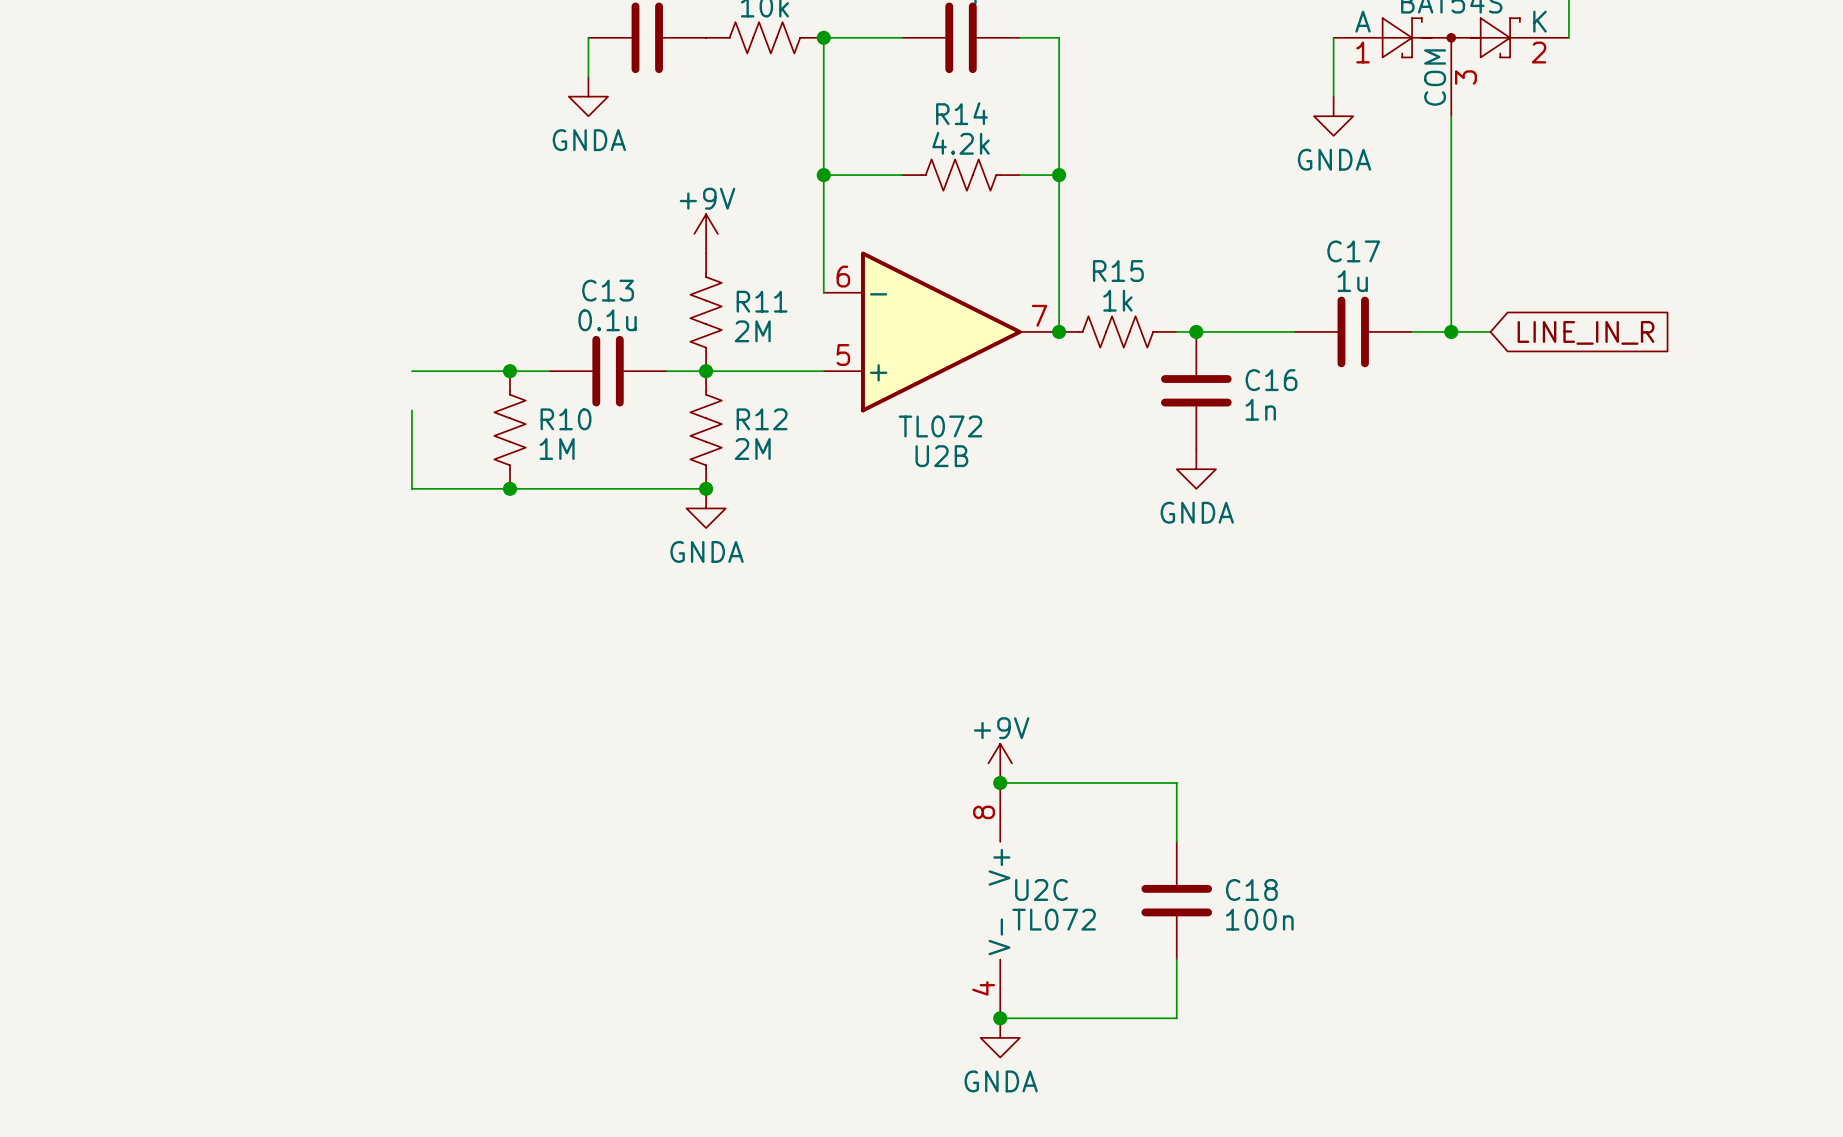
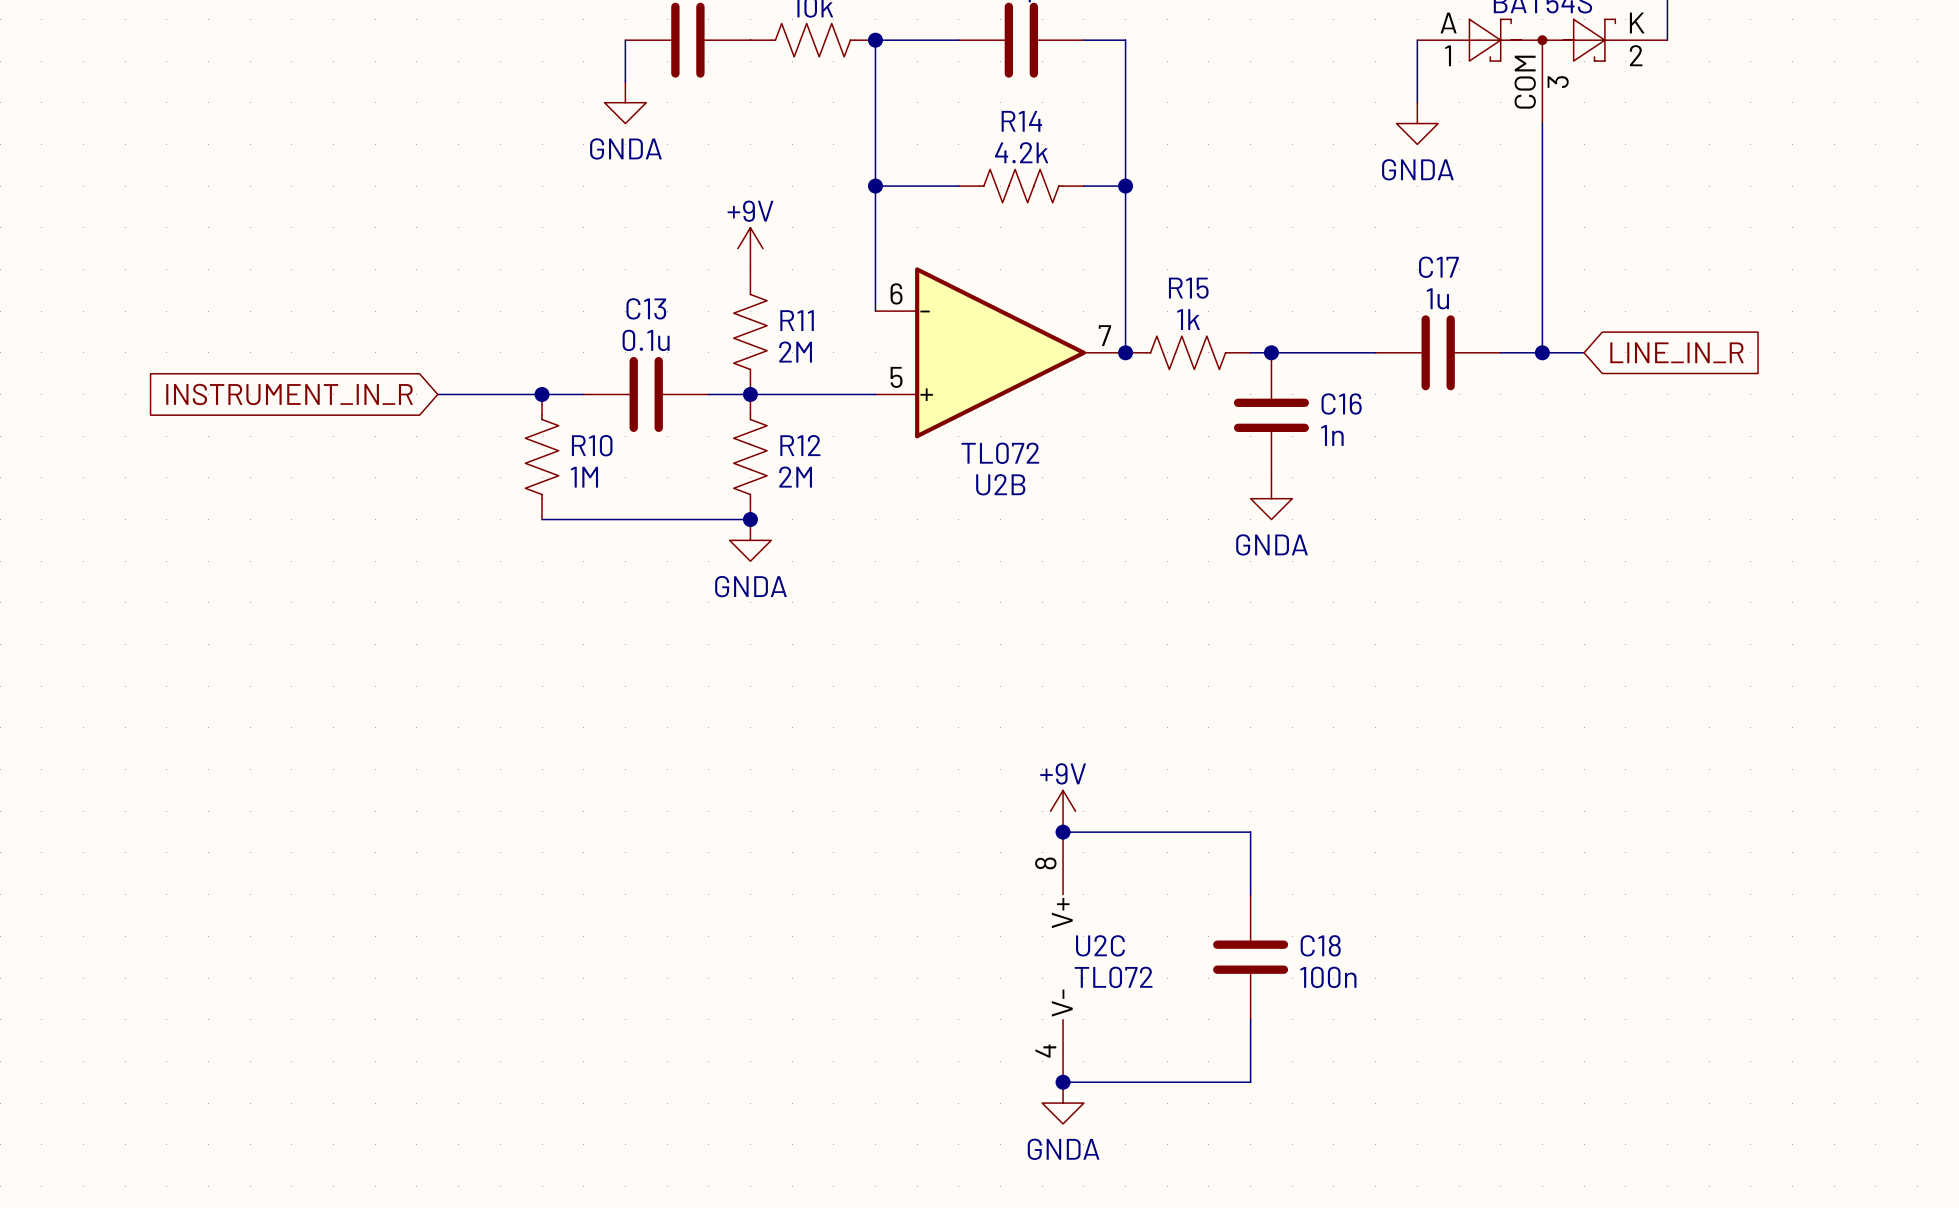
global label: none -> INSTRUMENT_IN_R (289, 394)
wire: (411, 410) (411, 488) (510, 488) -> none
junction: (510, 488) -> none

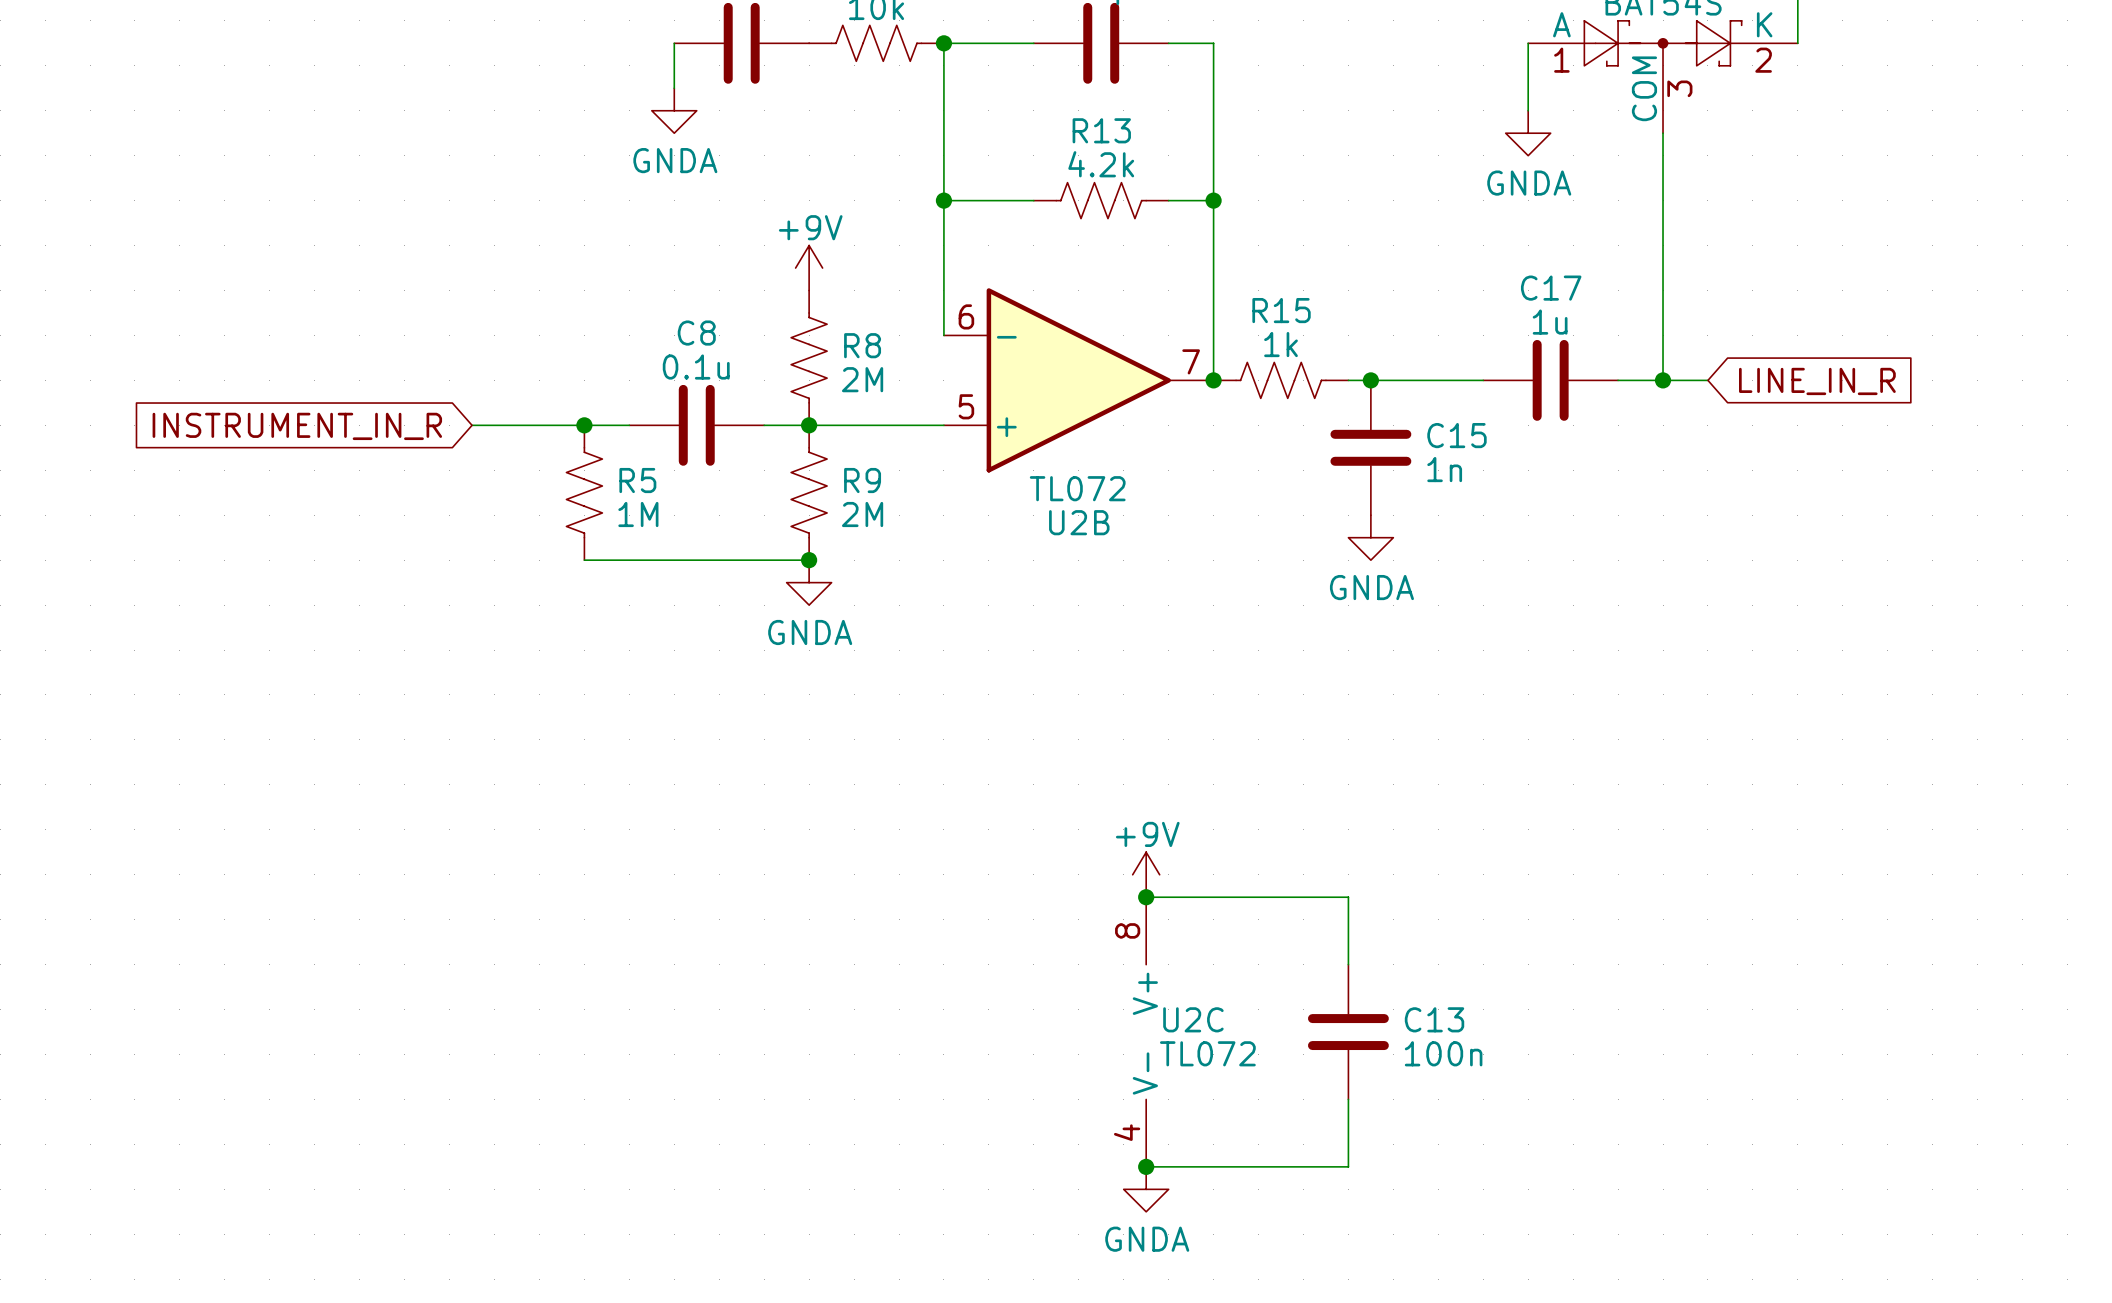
R14 name: R14 (1021, 121) -> R13 (1101, 130)
C13 name: C13 (646, 308) -> C8 (696, 333)
R11 name: R11 (797, 320) -> R8 (862, 345)
C16 name: C16 (1341, 404) -> C15 (1456, 435)
R10 name: R10 (592, 445) -> R5 (637, 480)
R12 name: R12 (800, 445) -> R9 (862, 480)
C18 name: C18 (1320, 945) -> C13 (1434, 1019)

